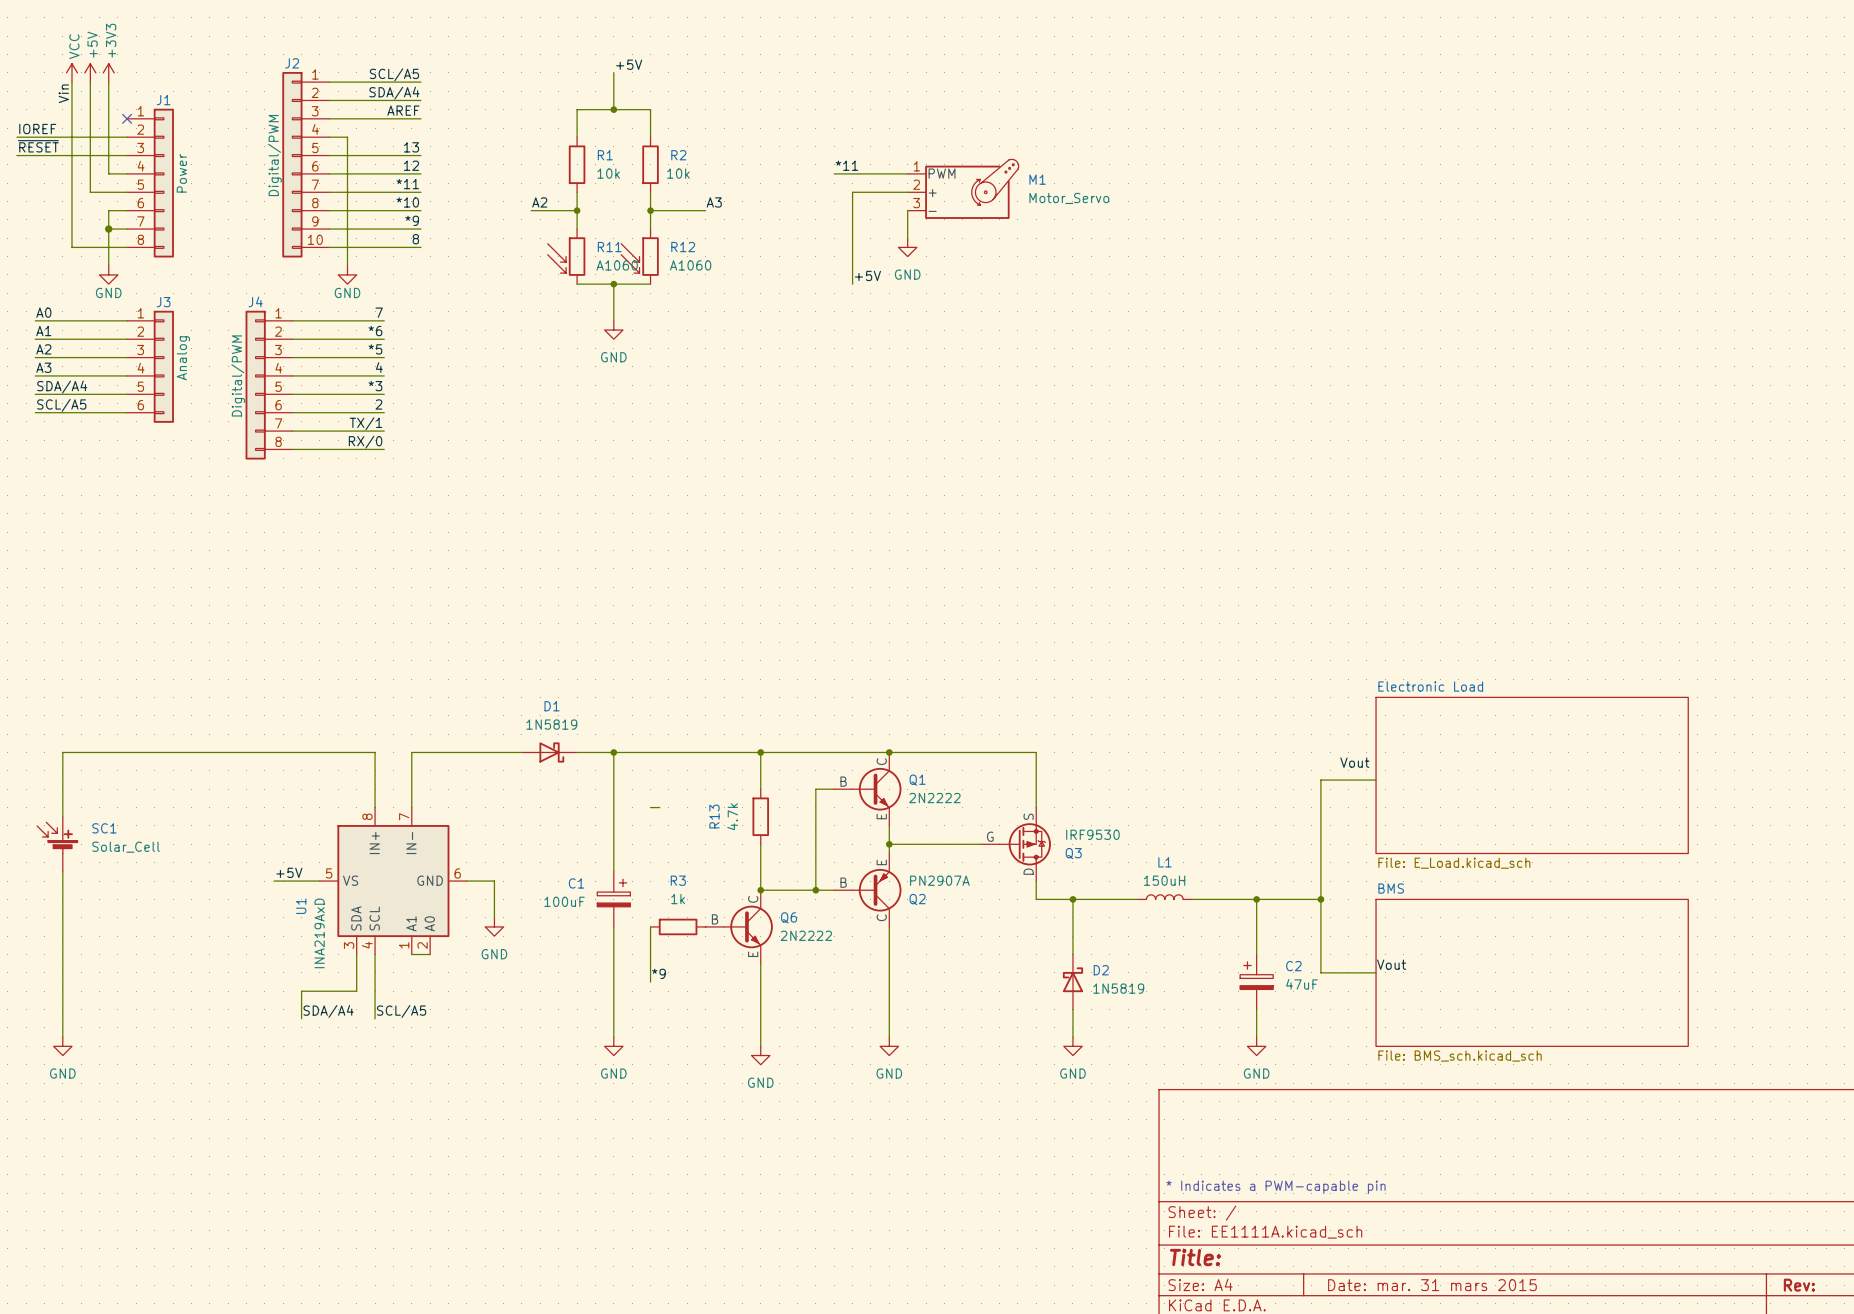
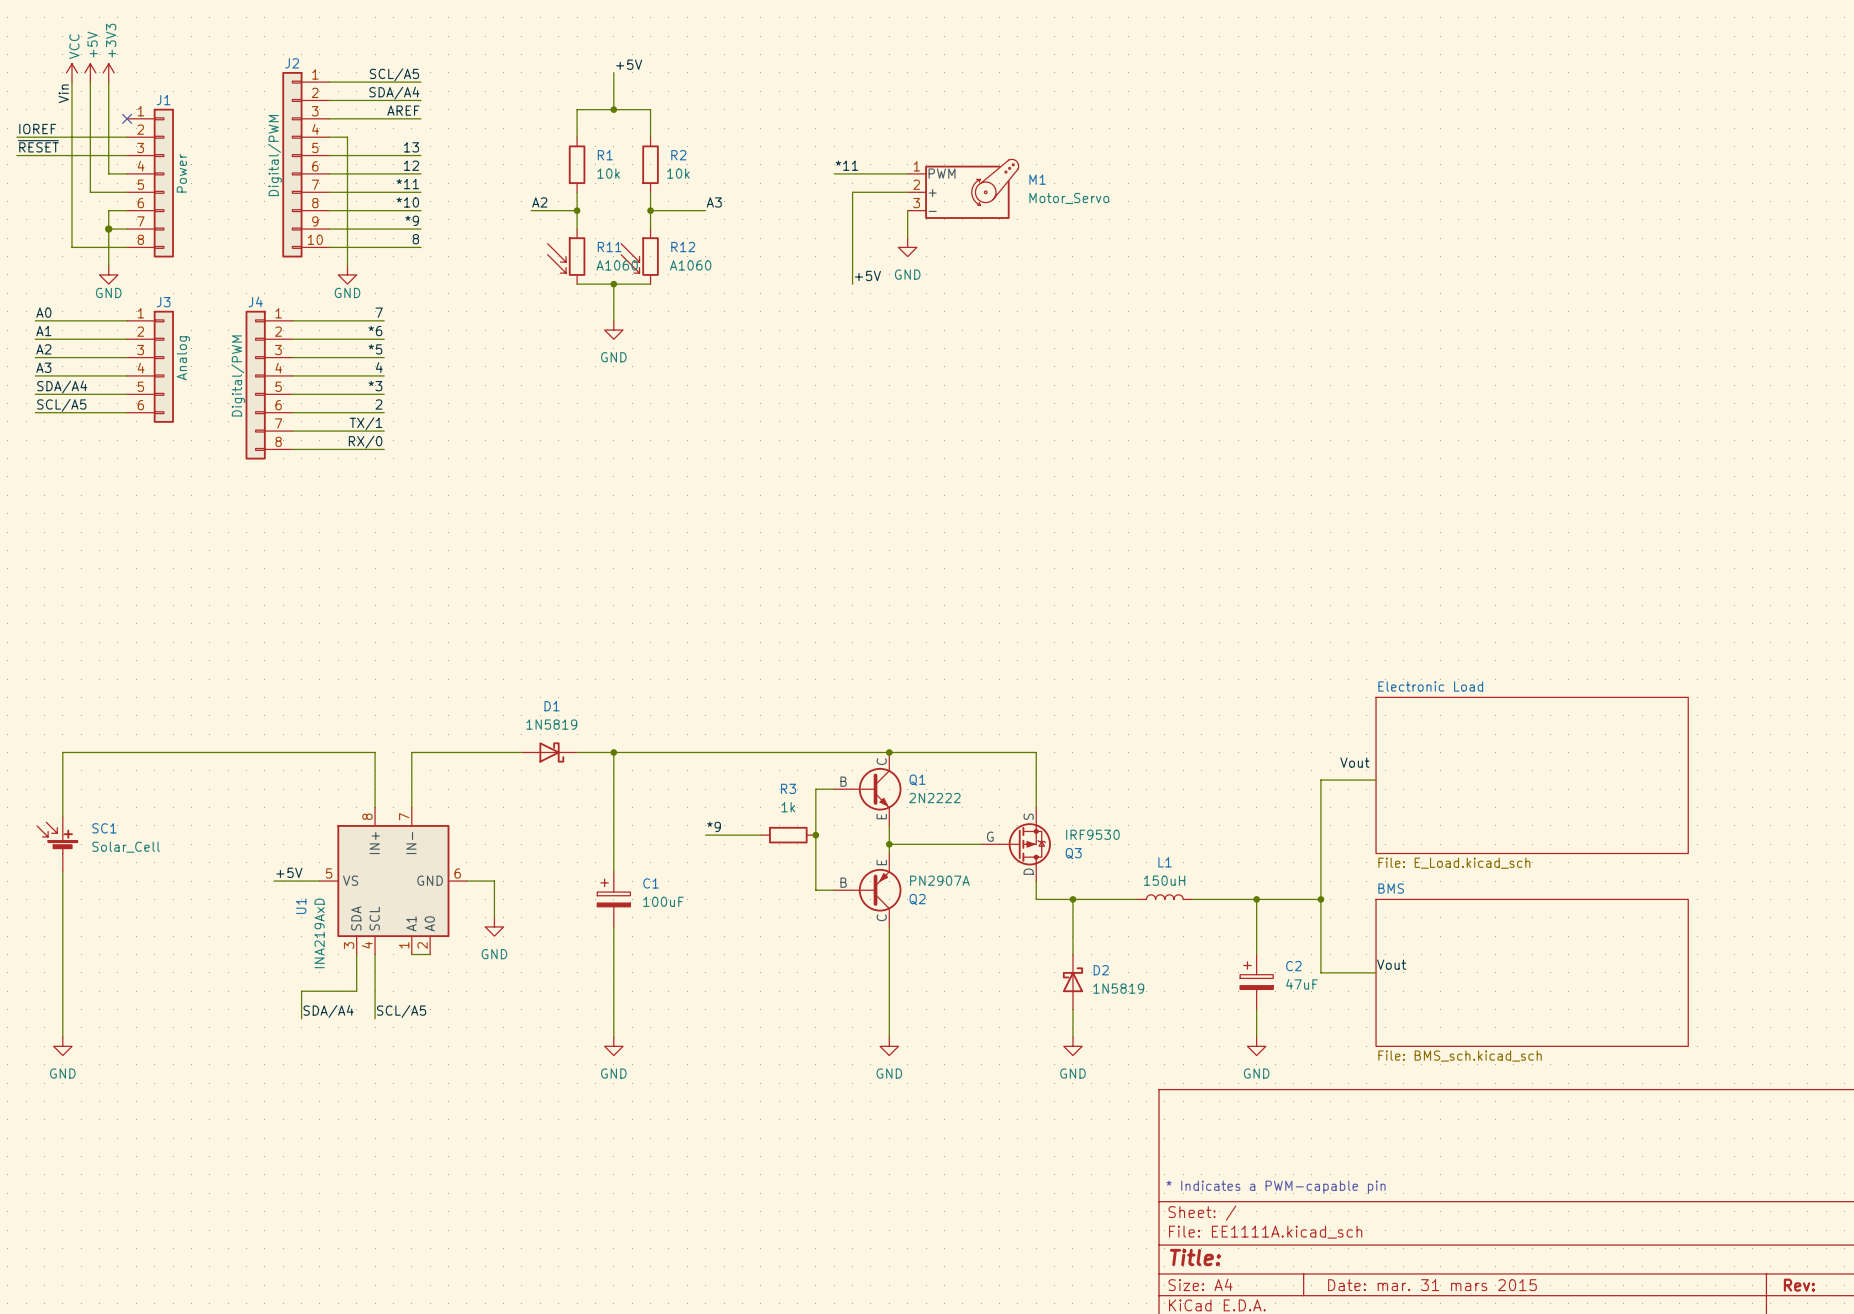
wire: (760, 752) (760, 789) -> none
junction: (760, 752) -> none
wire: (650, 807) (659, 807) -> none
R13: 4.7k (760, 816) -> none
wire: none -> (705, 835) (760, 835)
junction: none -> (815, 835)
wire: (760, 844) (760, 890) (815, 890) -> none
junction: (760, 890) -> none
junction: (815, 890) -> none
C1 flip: as is (613, 892) -> left-right (613, 892)
wire: (650, 926) (650, 982) -> none
R3 position: (678, 926) -> (788, 835)
Q6: 2N2222 (739, 926) -> none
wire: (760, 963) (760, 1046) -> none
label position: *9 (658, 973) -> *9 (714, 826)
power symbol: GND (760, 1055) -> none

